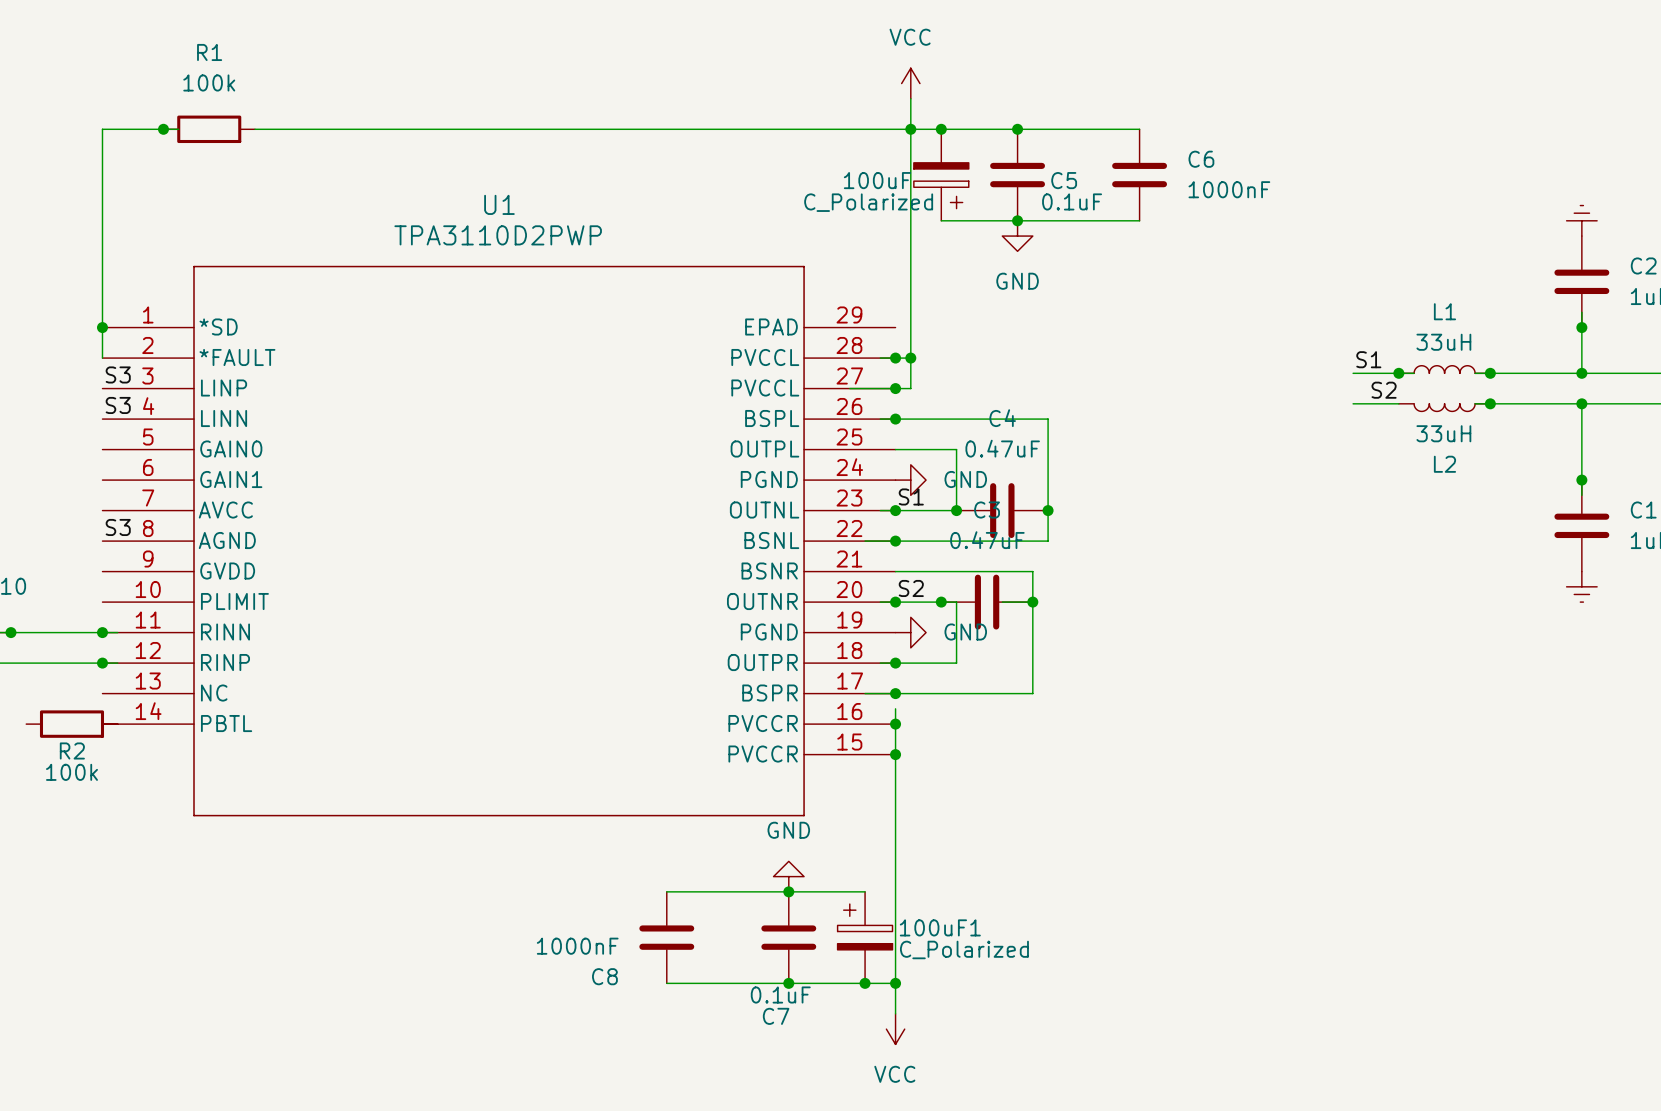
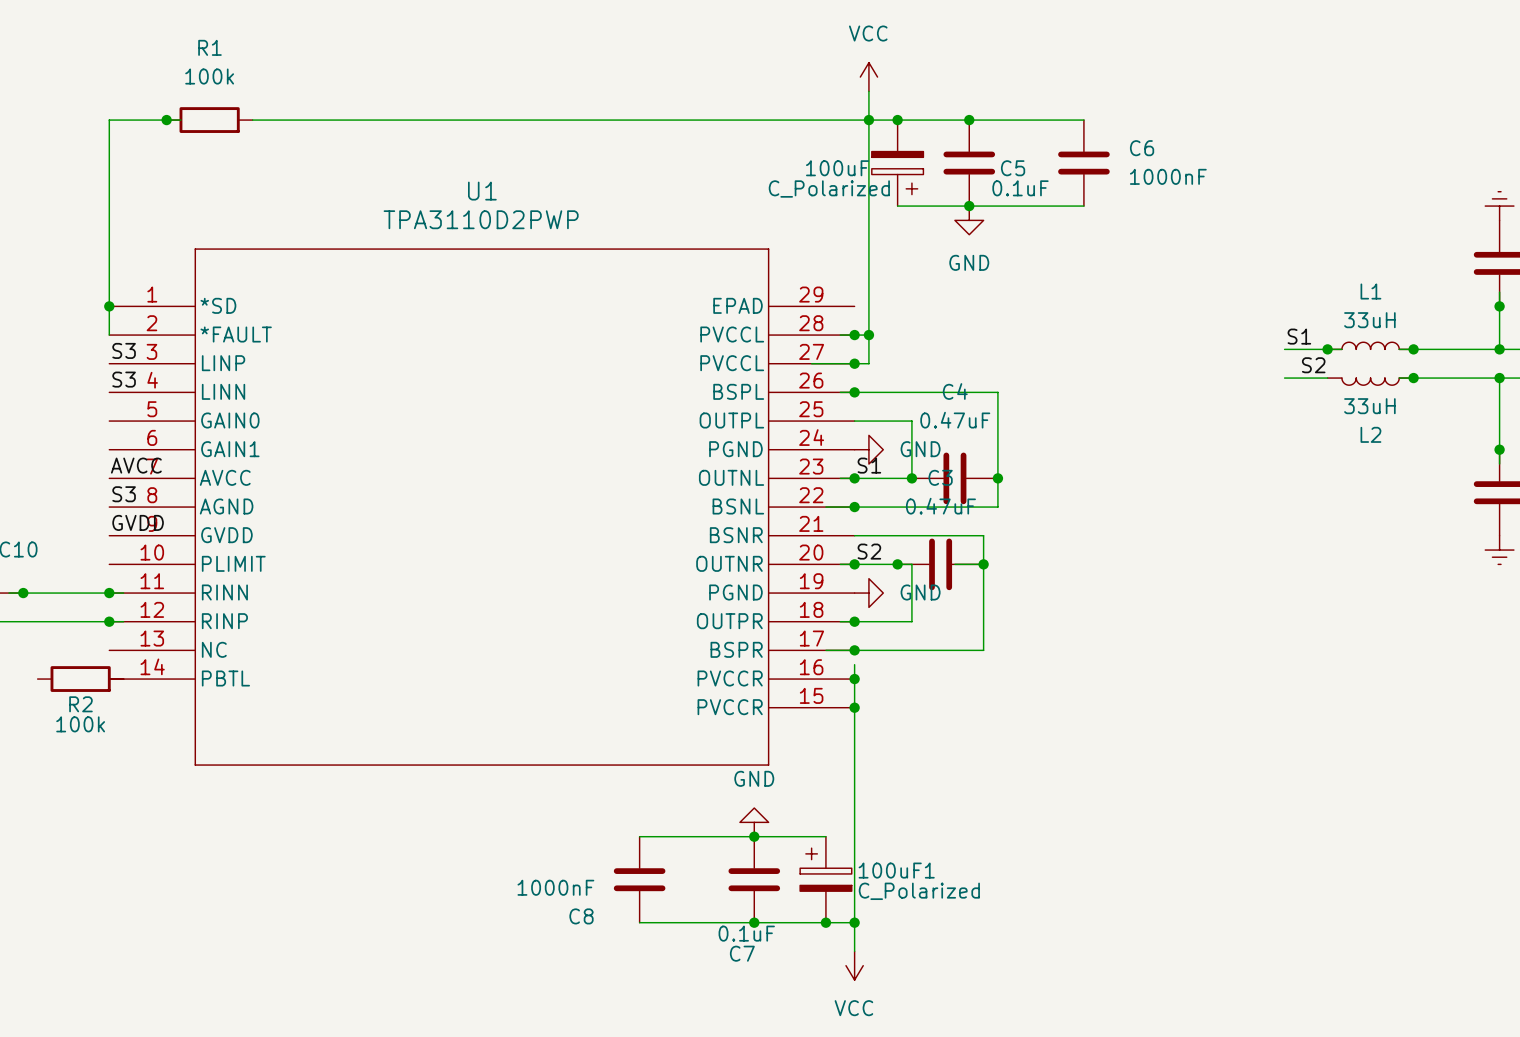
label: none -> AVCC (136, 465)
label: none -> GVDD (138, 522)

